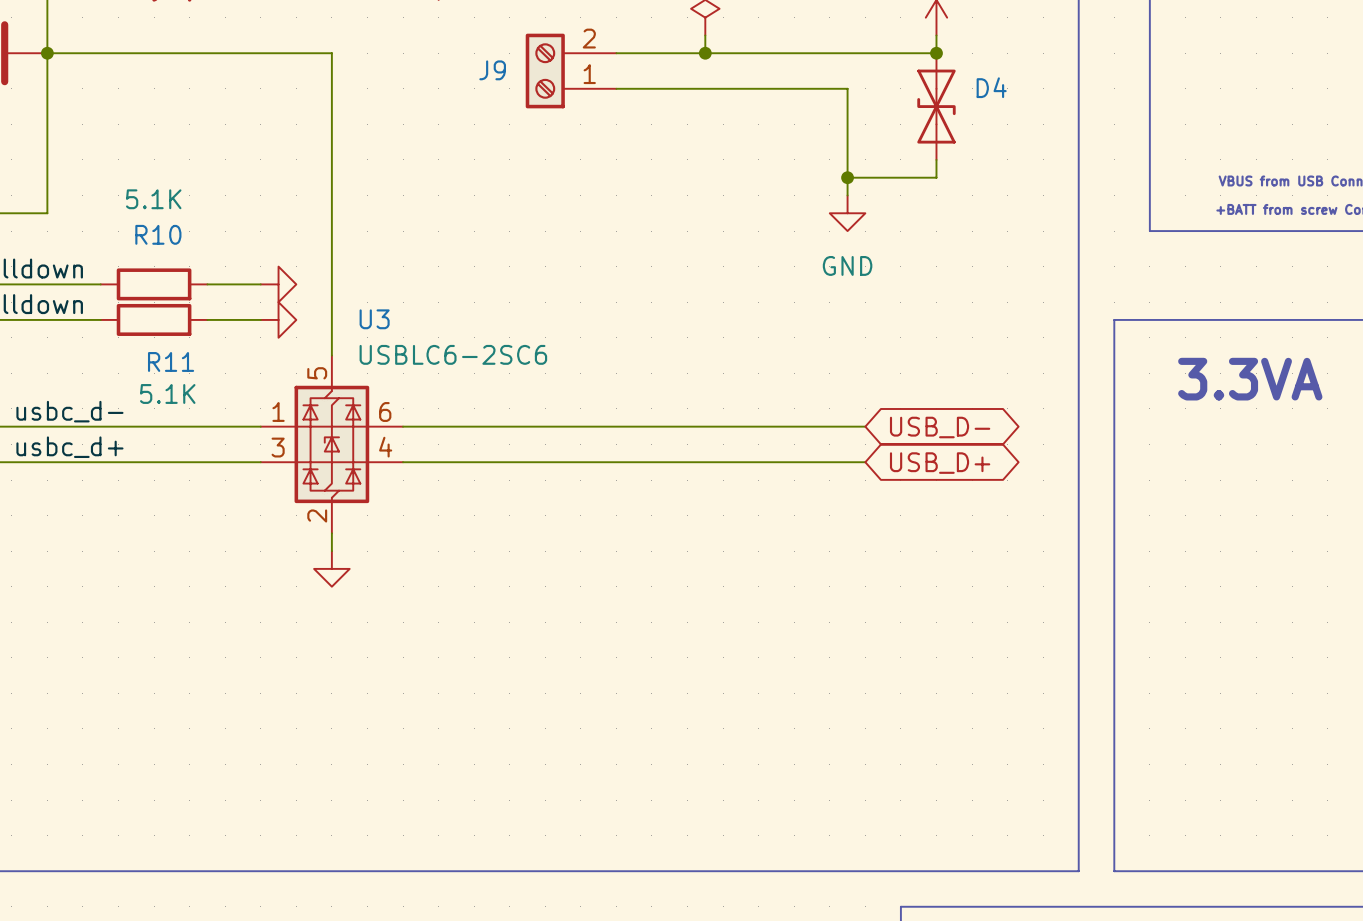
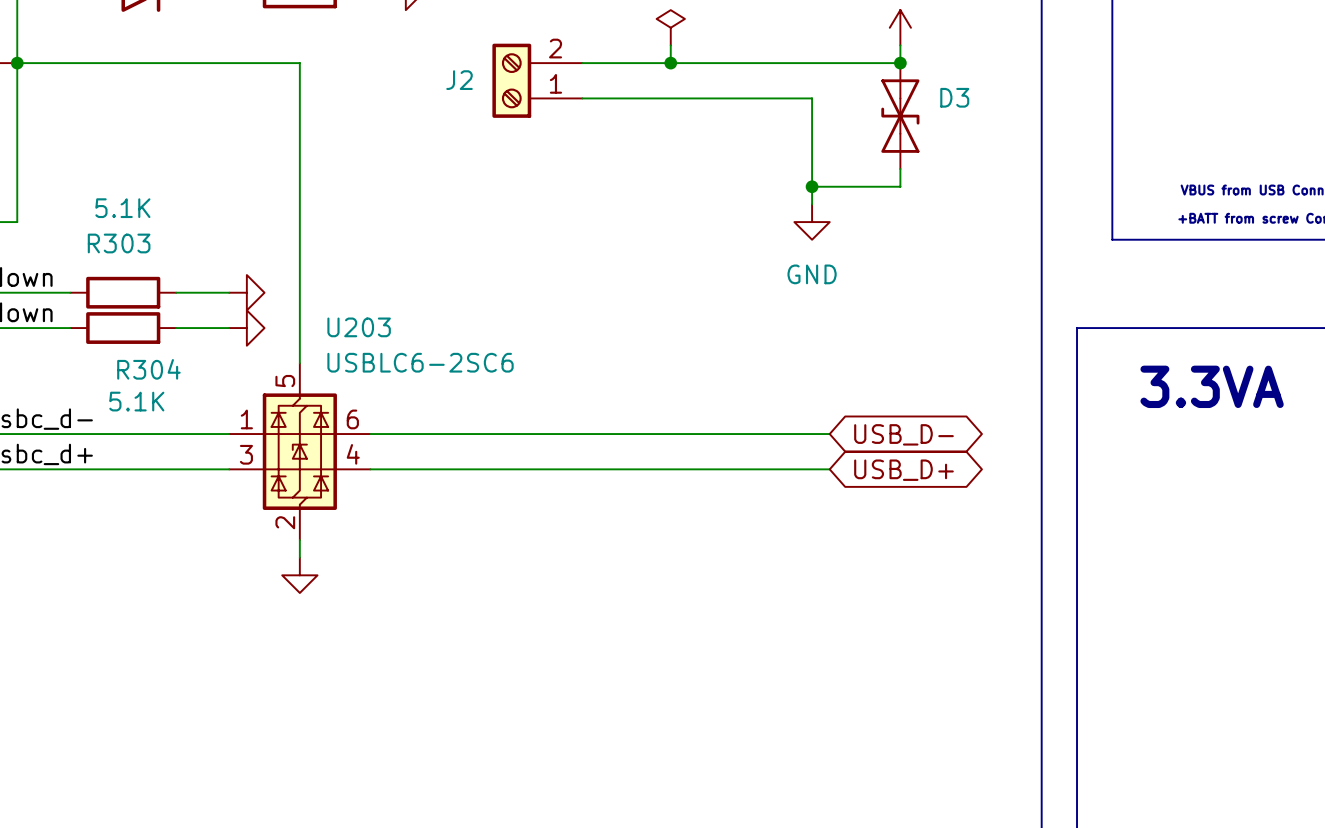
J9 name: J9 (492, 70) -> J2 (459, 80)
D4 name: D4 (991, 87) -> D3 (954, 97)
R10 name: R10 (158, 234) -> R303 (119, 243)
U3 name: U3 (374, 319) -> U203 (359, 327)
R11 name: R11 (171, 361) -> R304 (148, 369)

